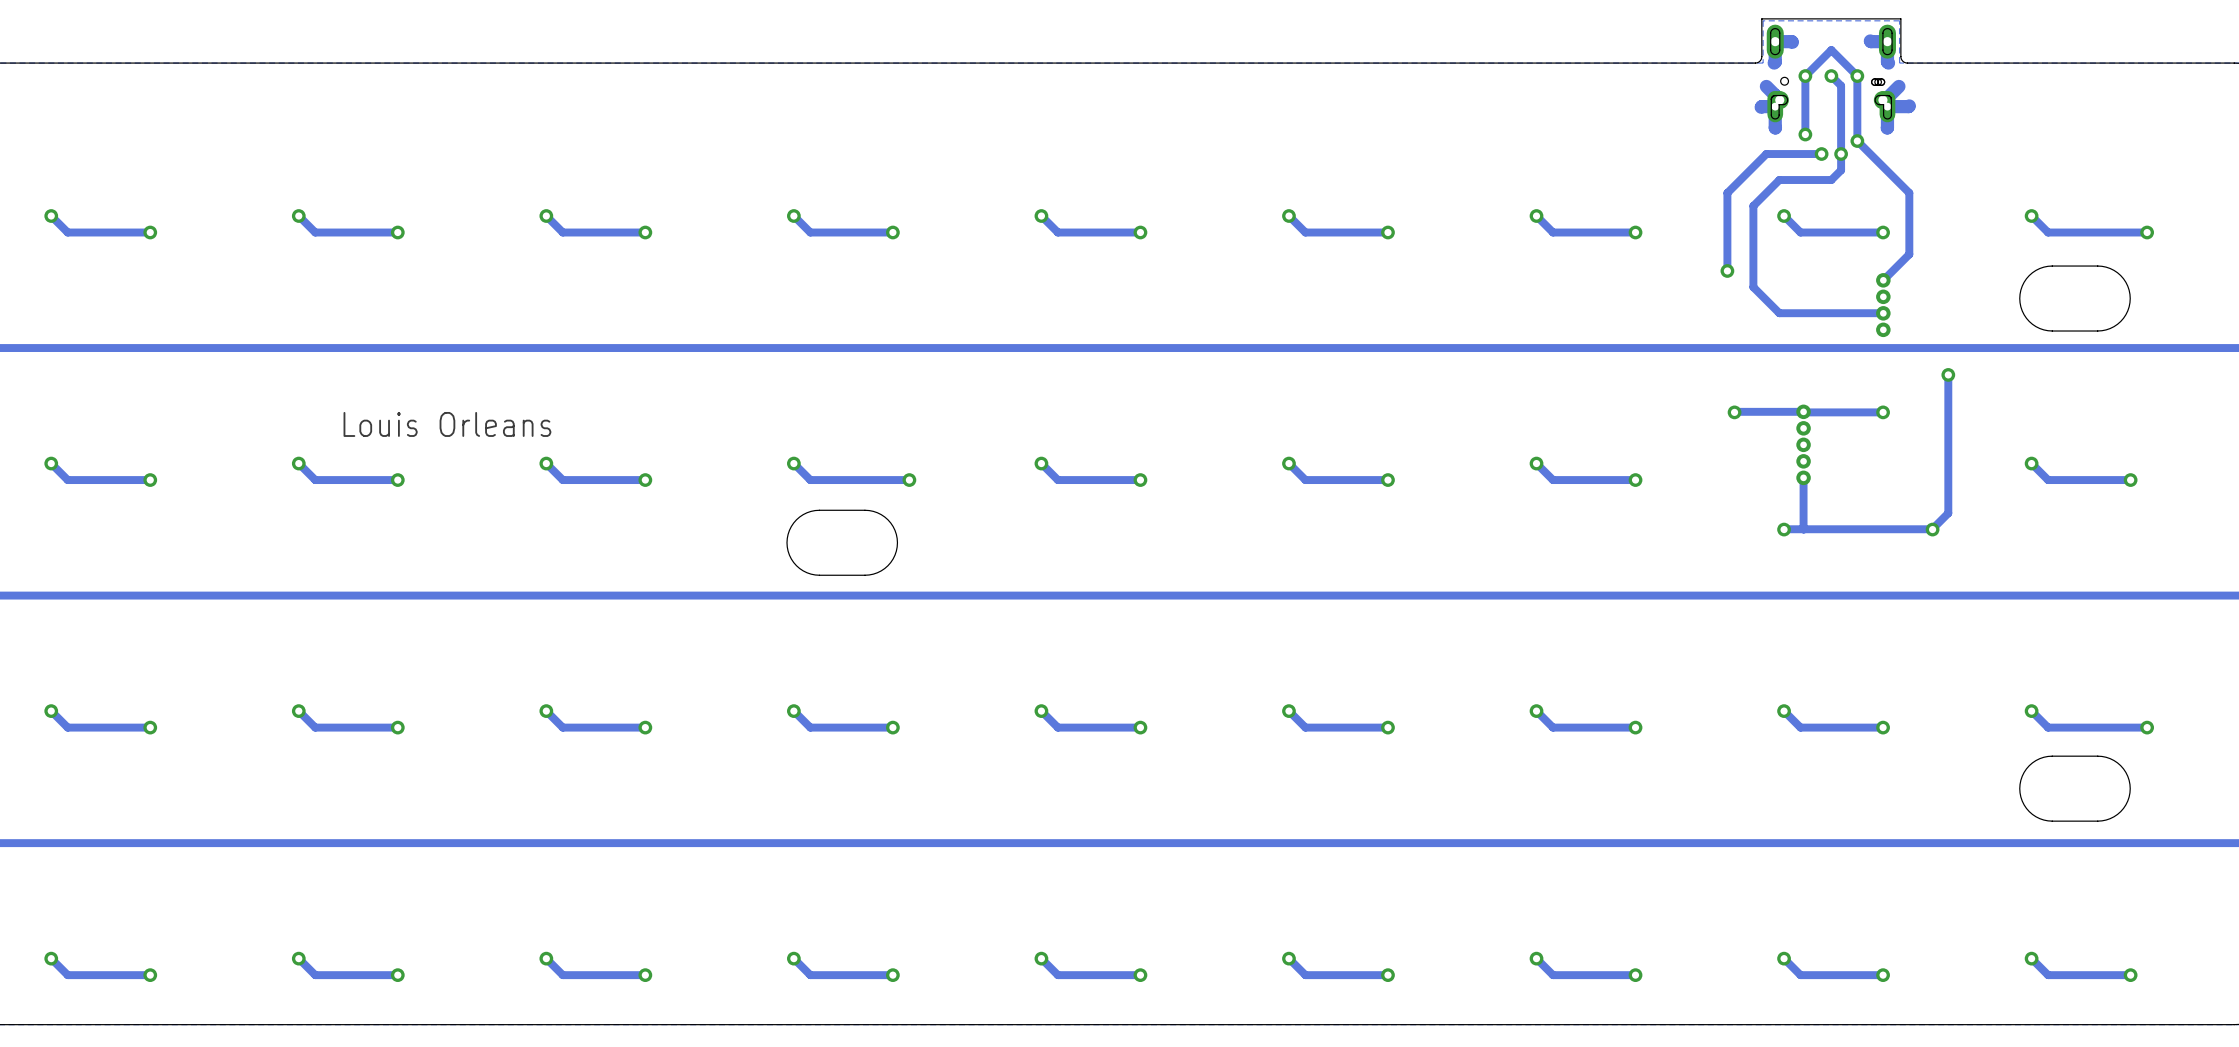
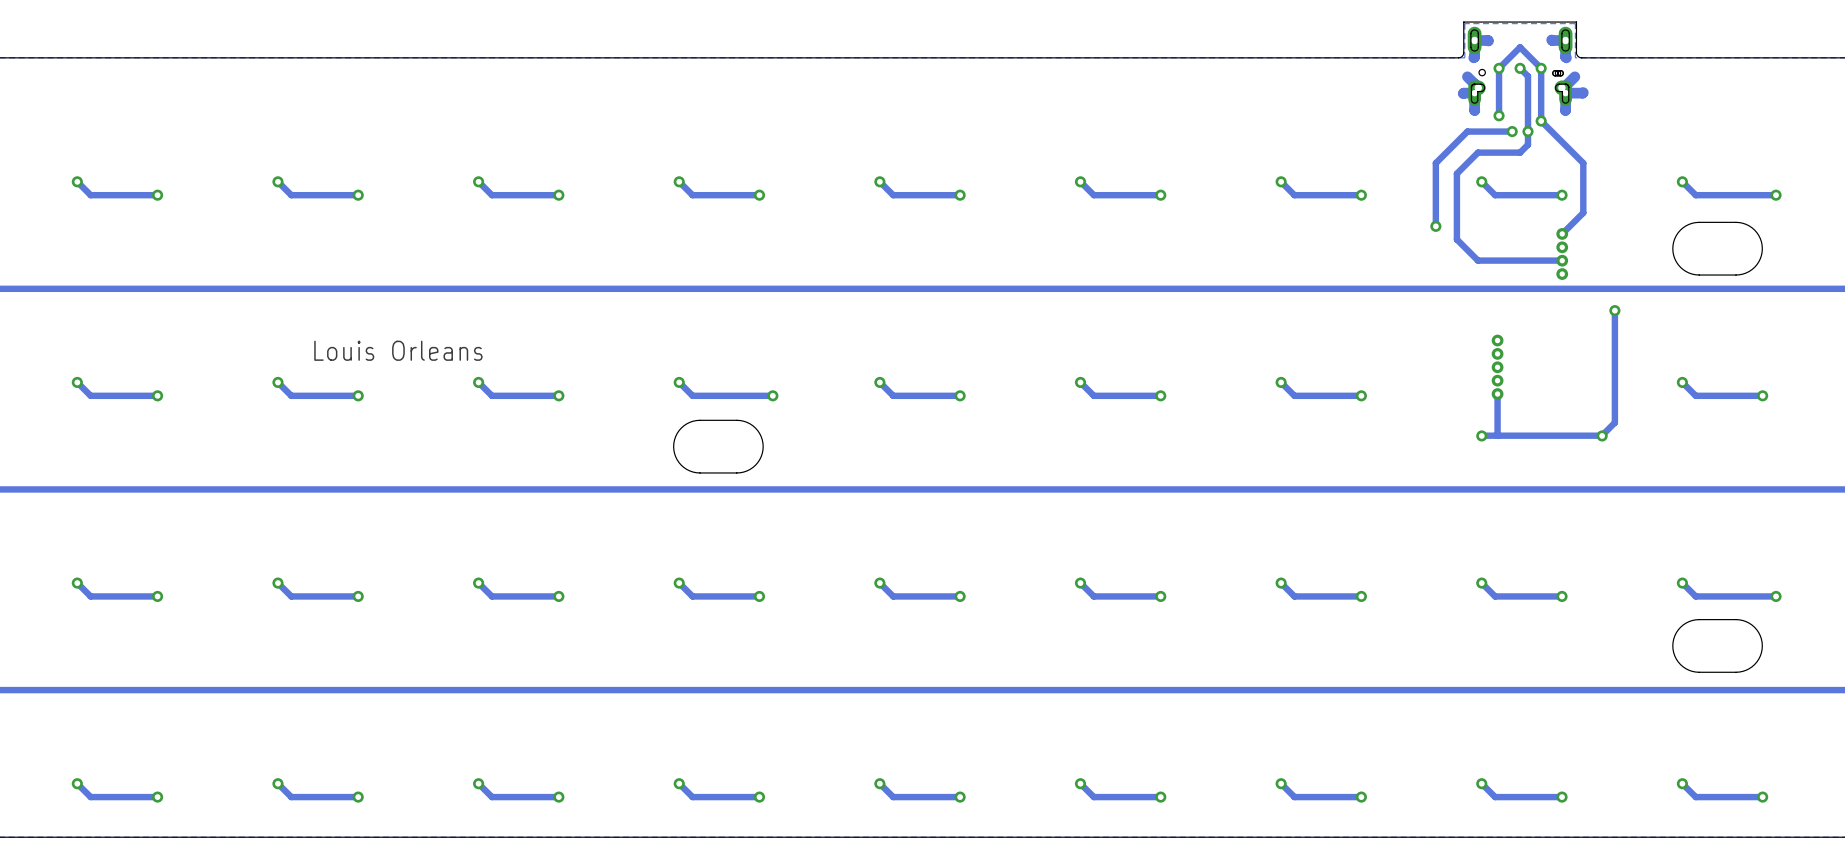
track: (1882, 411) (1734, 412) -> none
via: (1734, 412) -> none
via: (1883, 412) -> none

